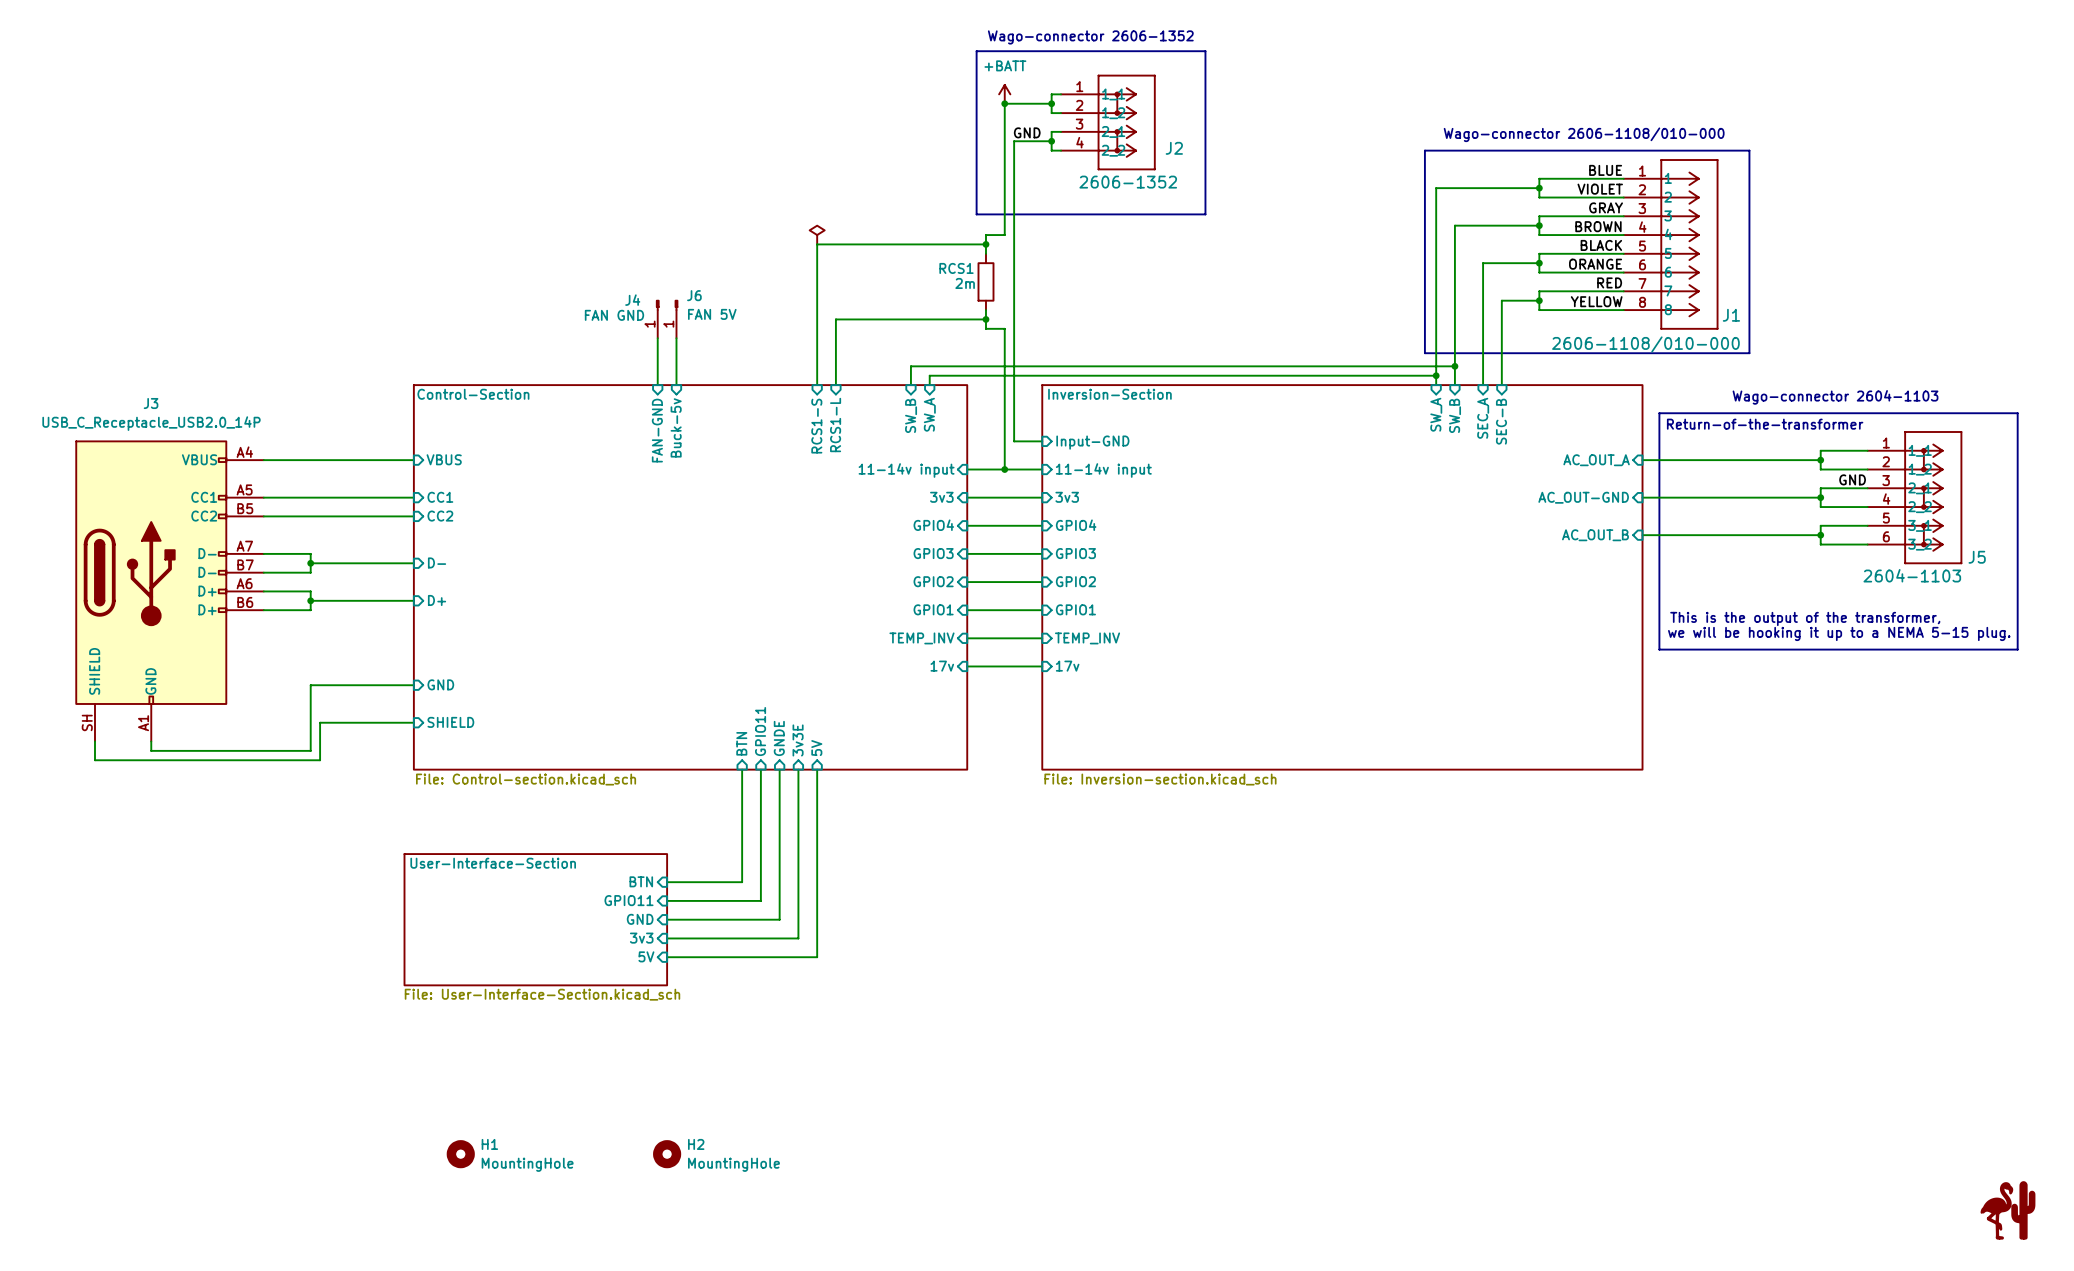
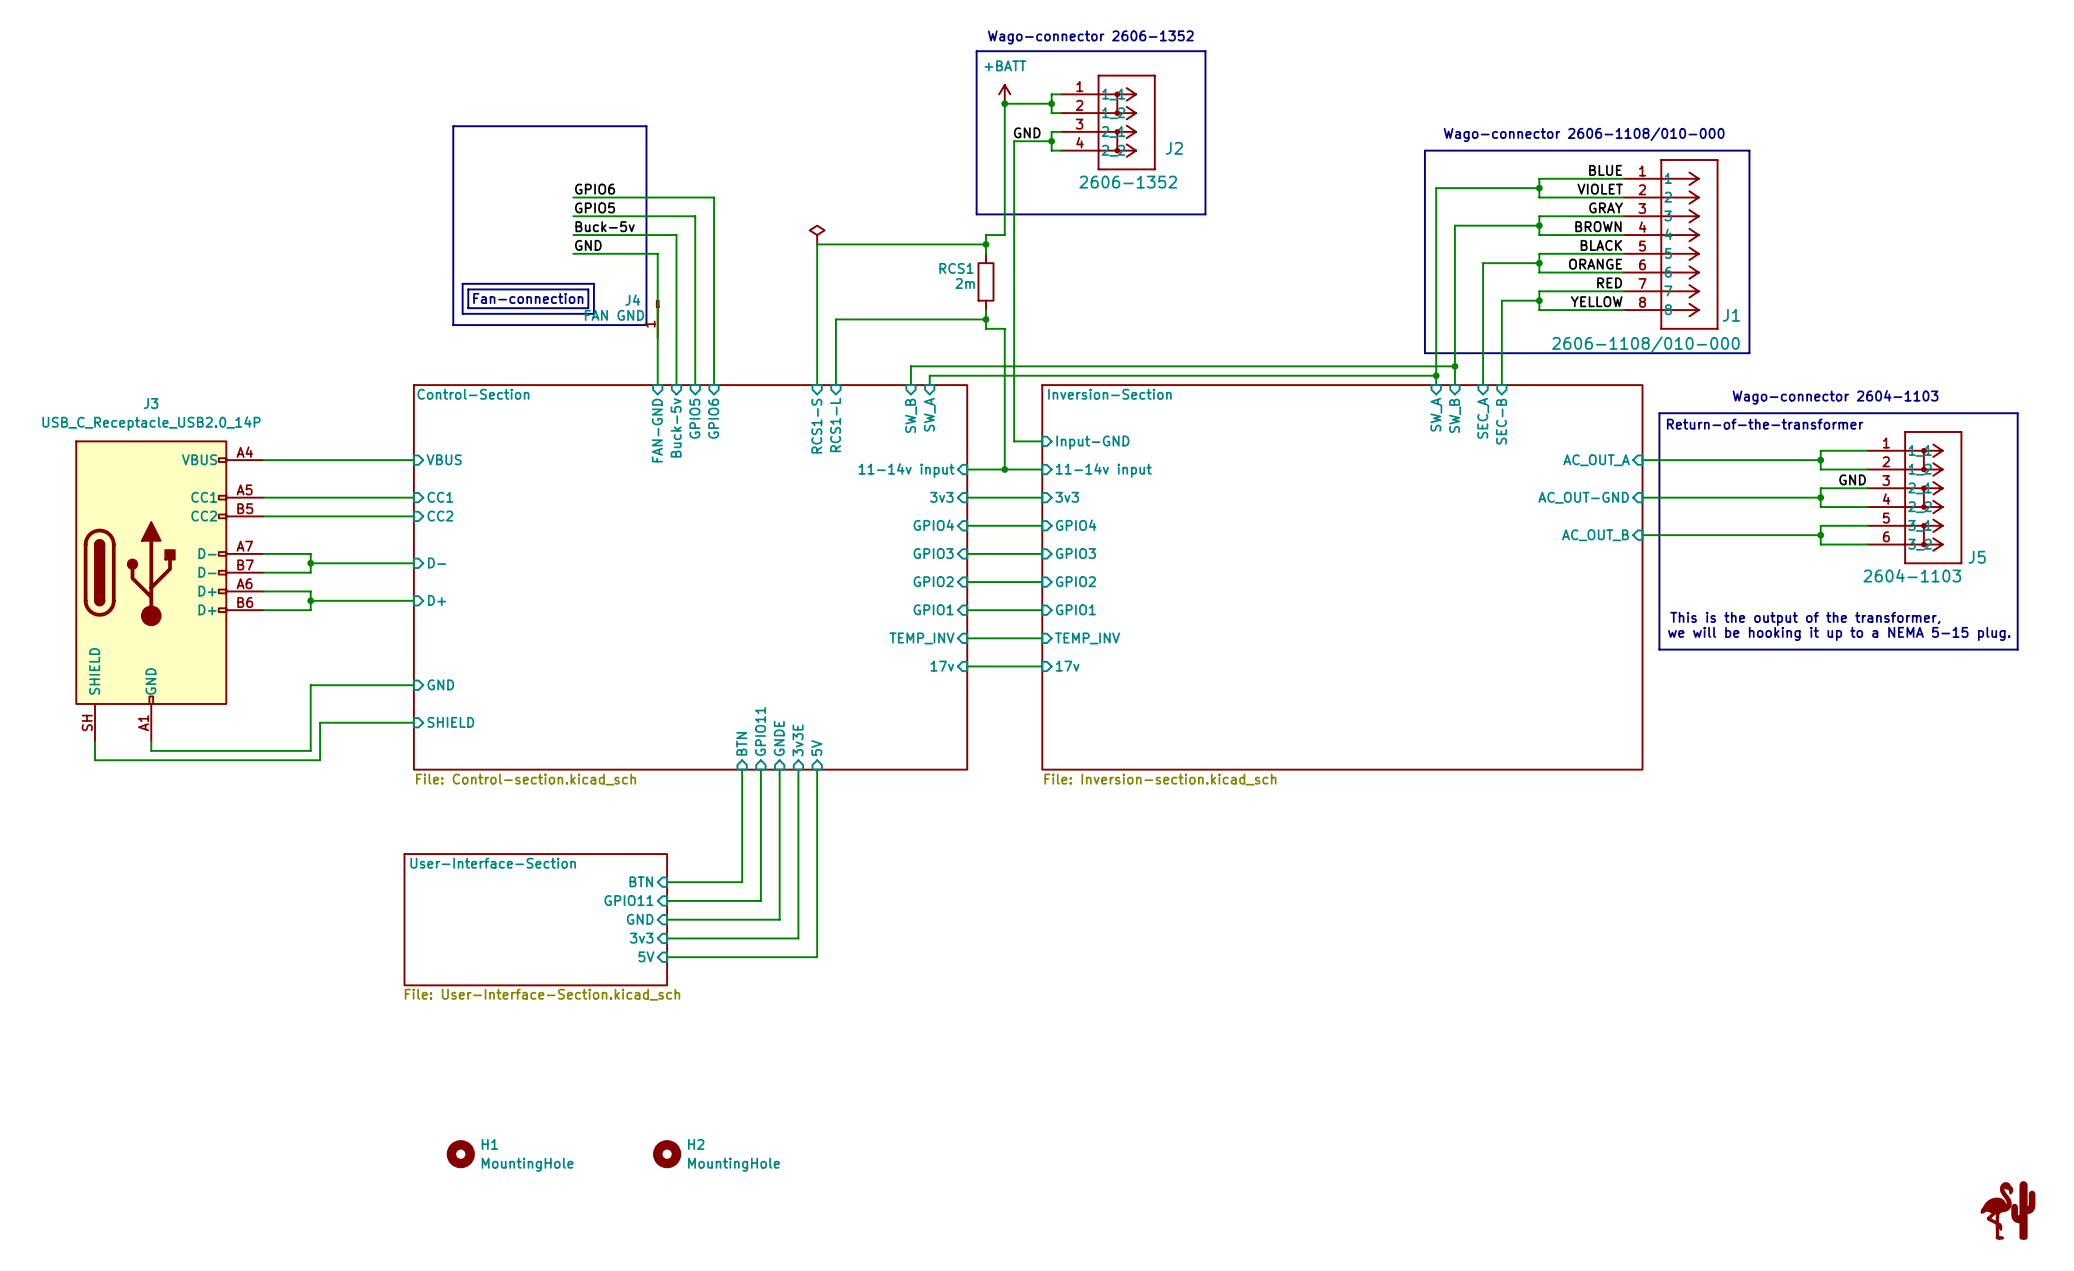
line: none -> (453, 126) (646, 126) (646, 325) (453, 325) (453, 126)
label: none -> GPIO6 (595, 189)
wire: none -> (573, 197) (714, 197) (714, 385)
label: none -> GPIO5 (595, 207)
wire: none -> (573, 216) (695, 216) (695, 385)
label: none -> Buck-5v (605, 226)
wire: none -> (573, 235) (676, 235) (676, 338)
label: none -> GND (588, 245)
wire: none -> (573, 253) (657, 253) (657, 338)
line: none -> (462, 283) (593, 283) (593, 313) (462, 313) (462, 283)
line: none -> (468, 289) (588, 289) (588, 308) (468, 308) (468, 289)
text: none -> Fan-connection (528, 298)
J6: FAN 5V (676, 319) -> none
sheet pin: none -> GPIO5 (694, 418)
sheet pin: none -> GPIO6 (713, 418)

